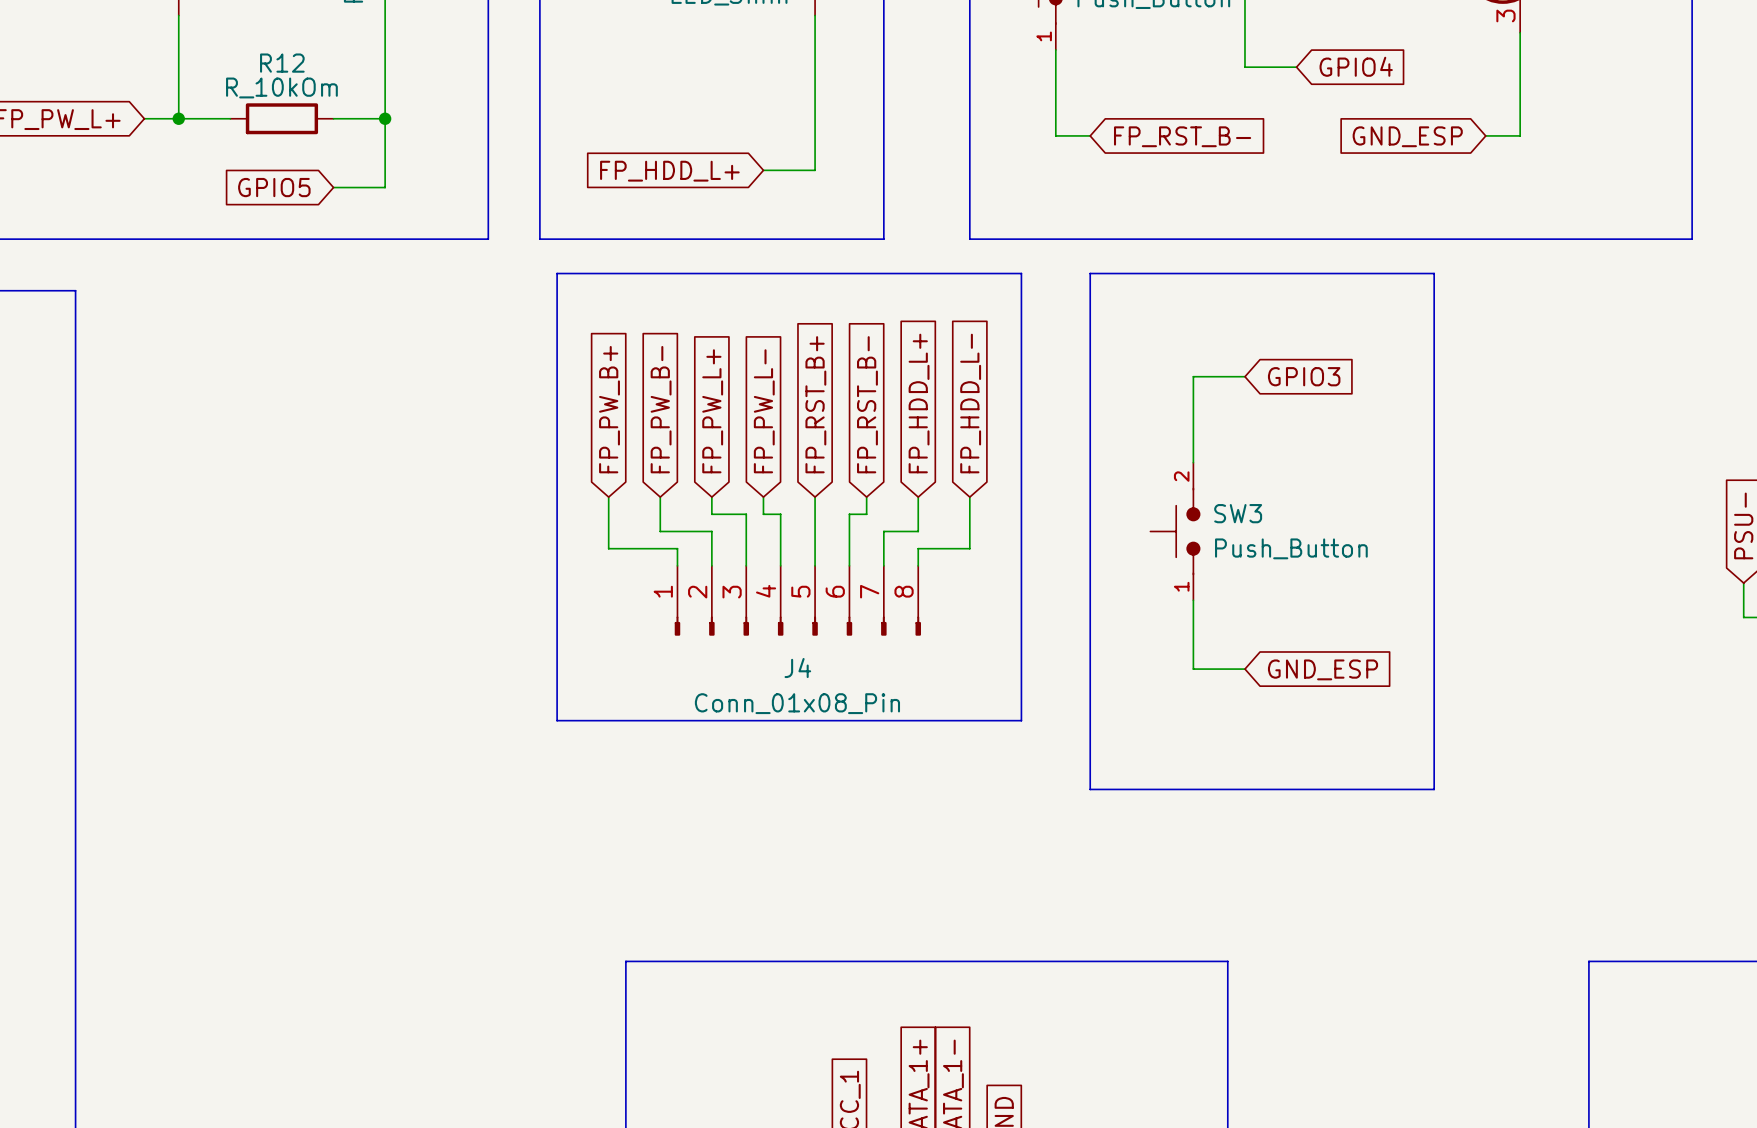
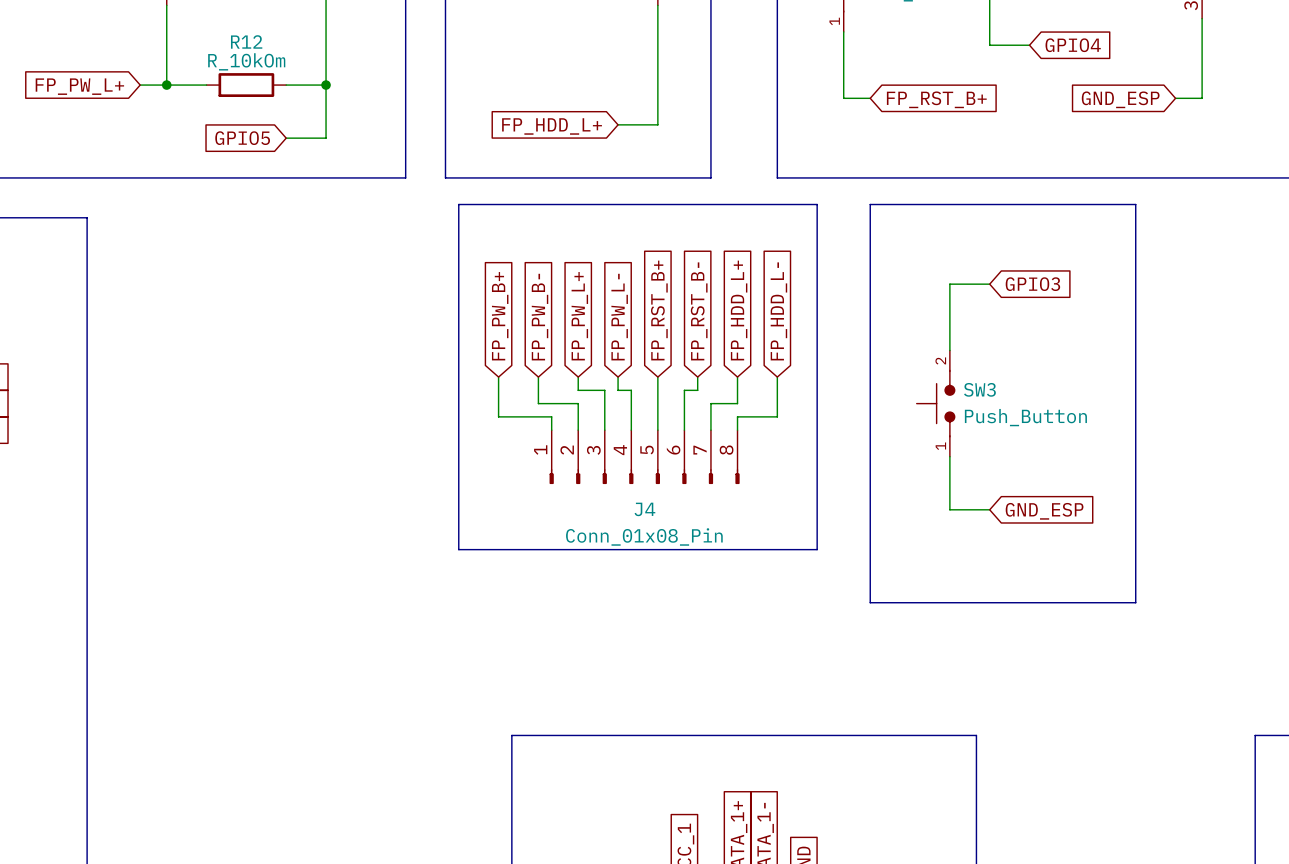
global label: FP_RST_B- (1182, 136) -> FP_RST_B+ (936, 99)

